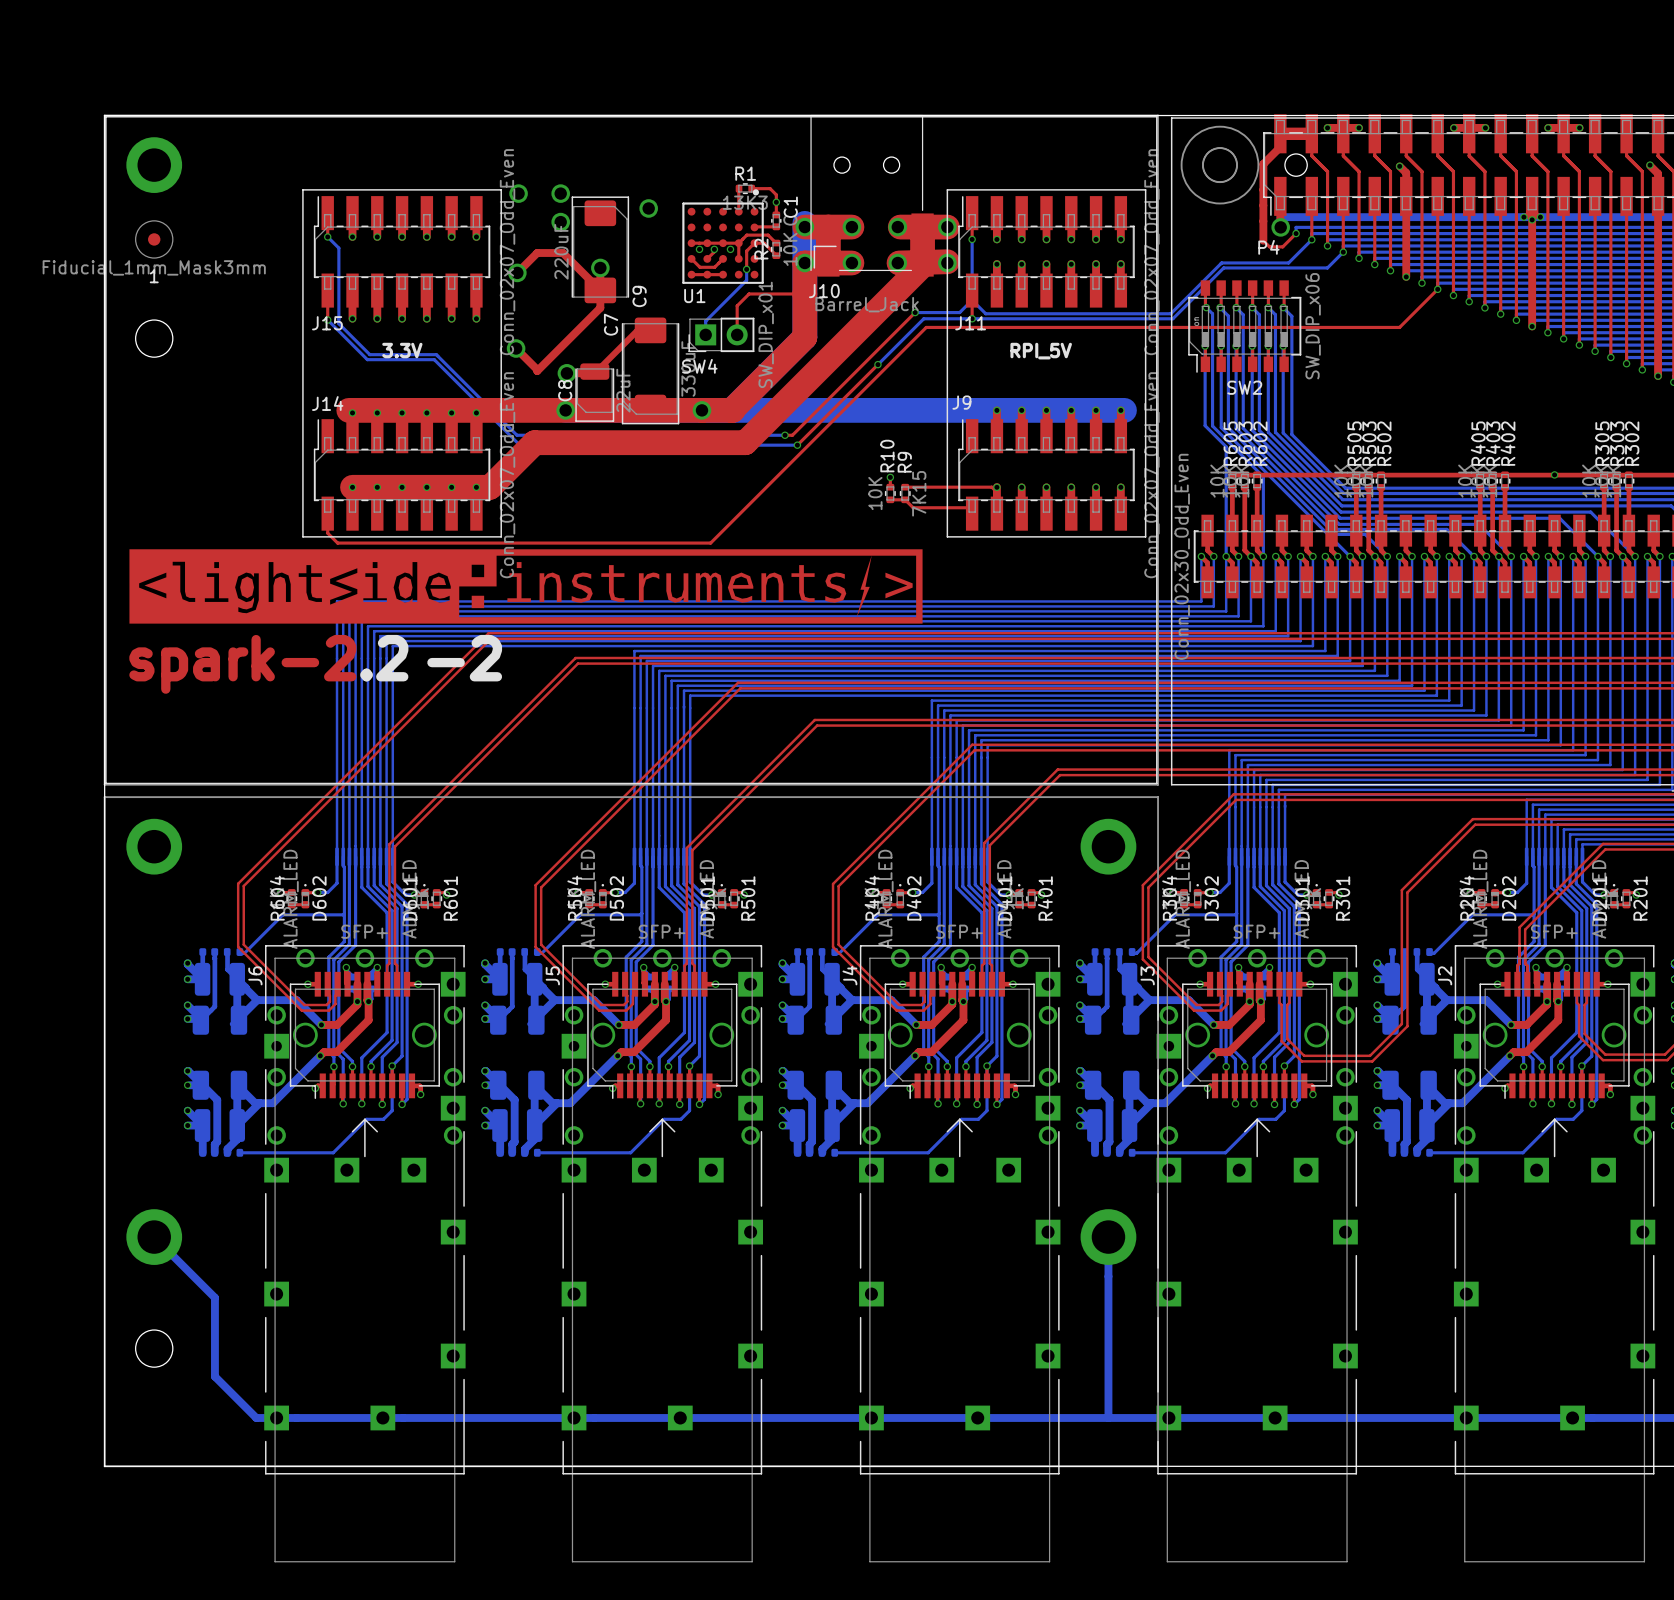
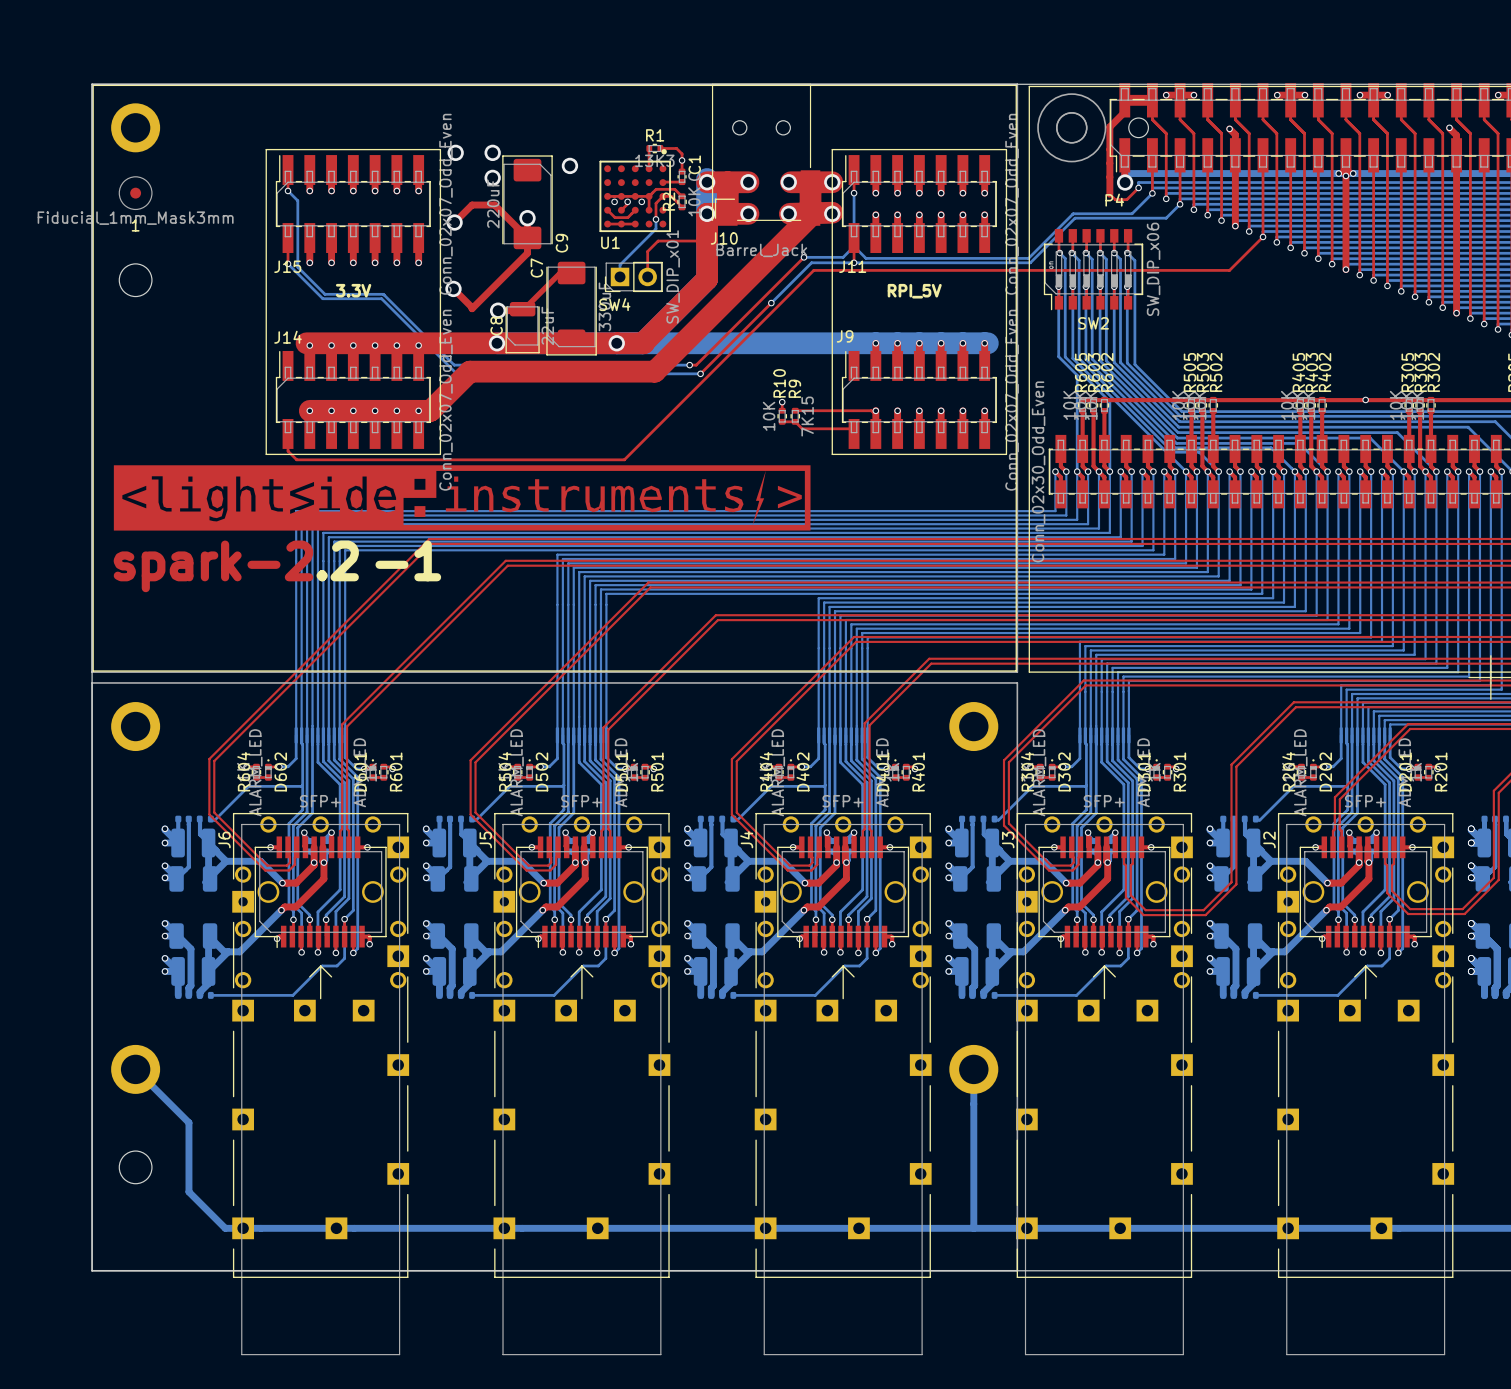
text: -2 (464, 658) -> -1 (408, 560)

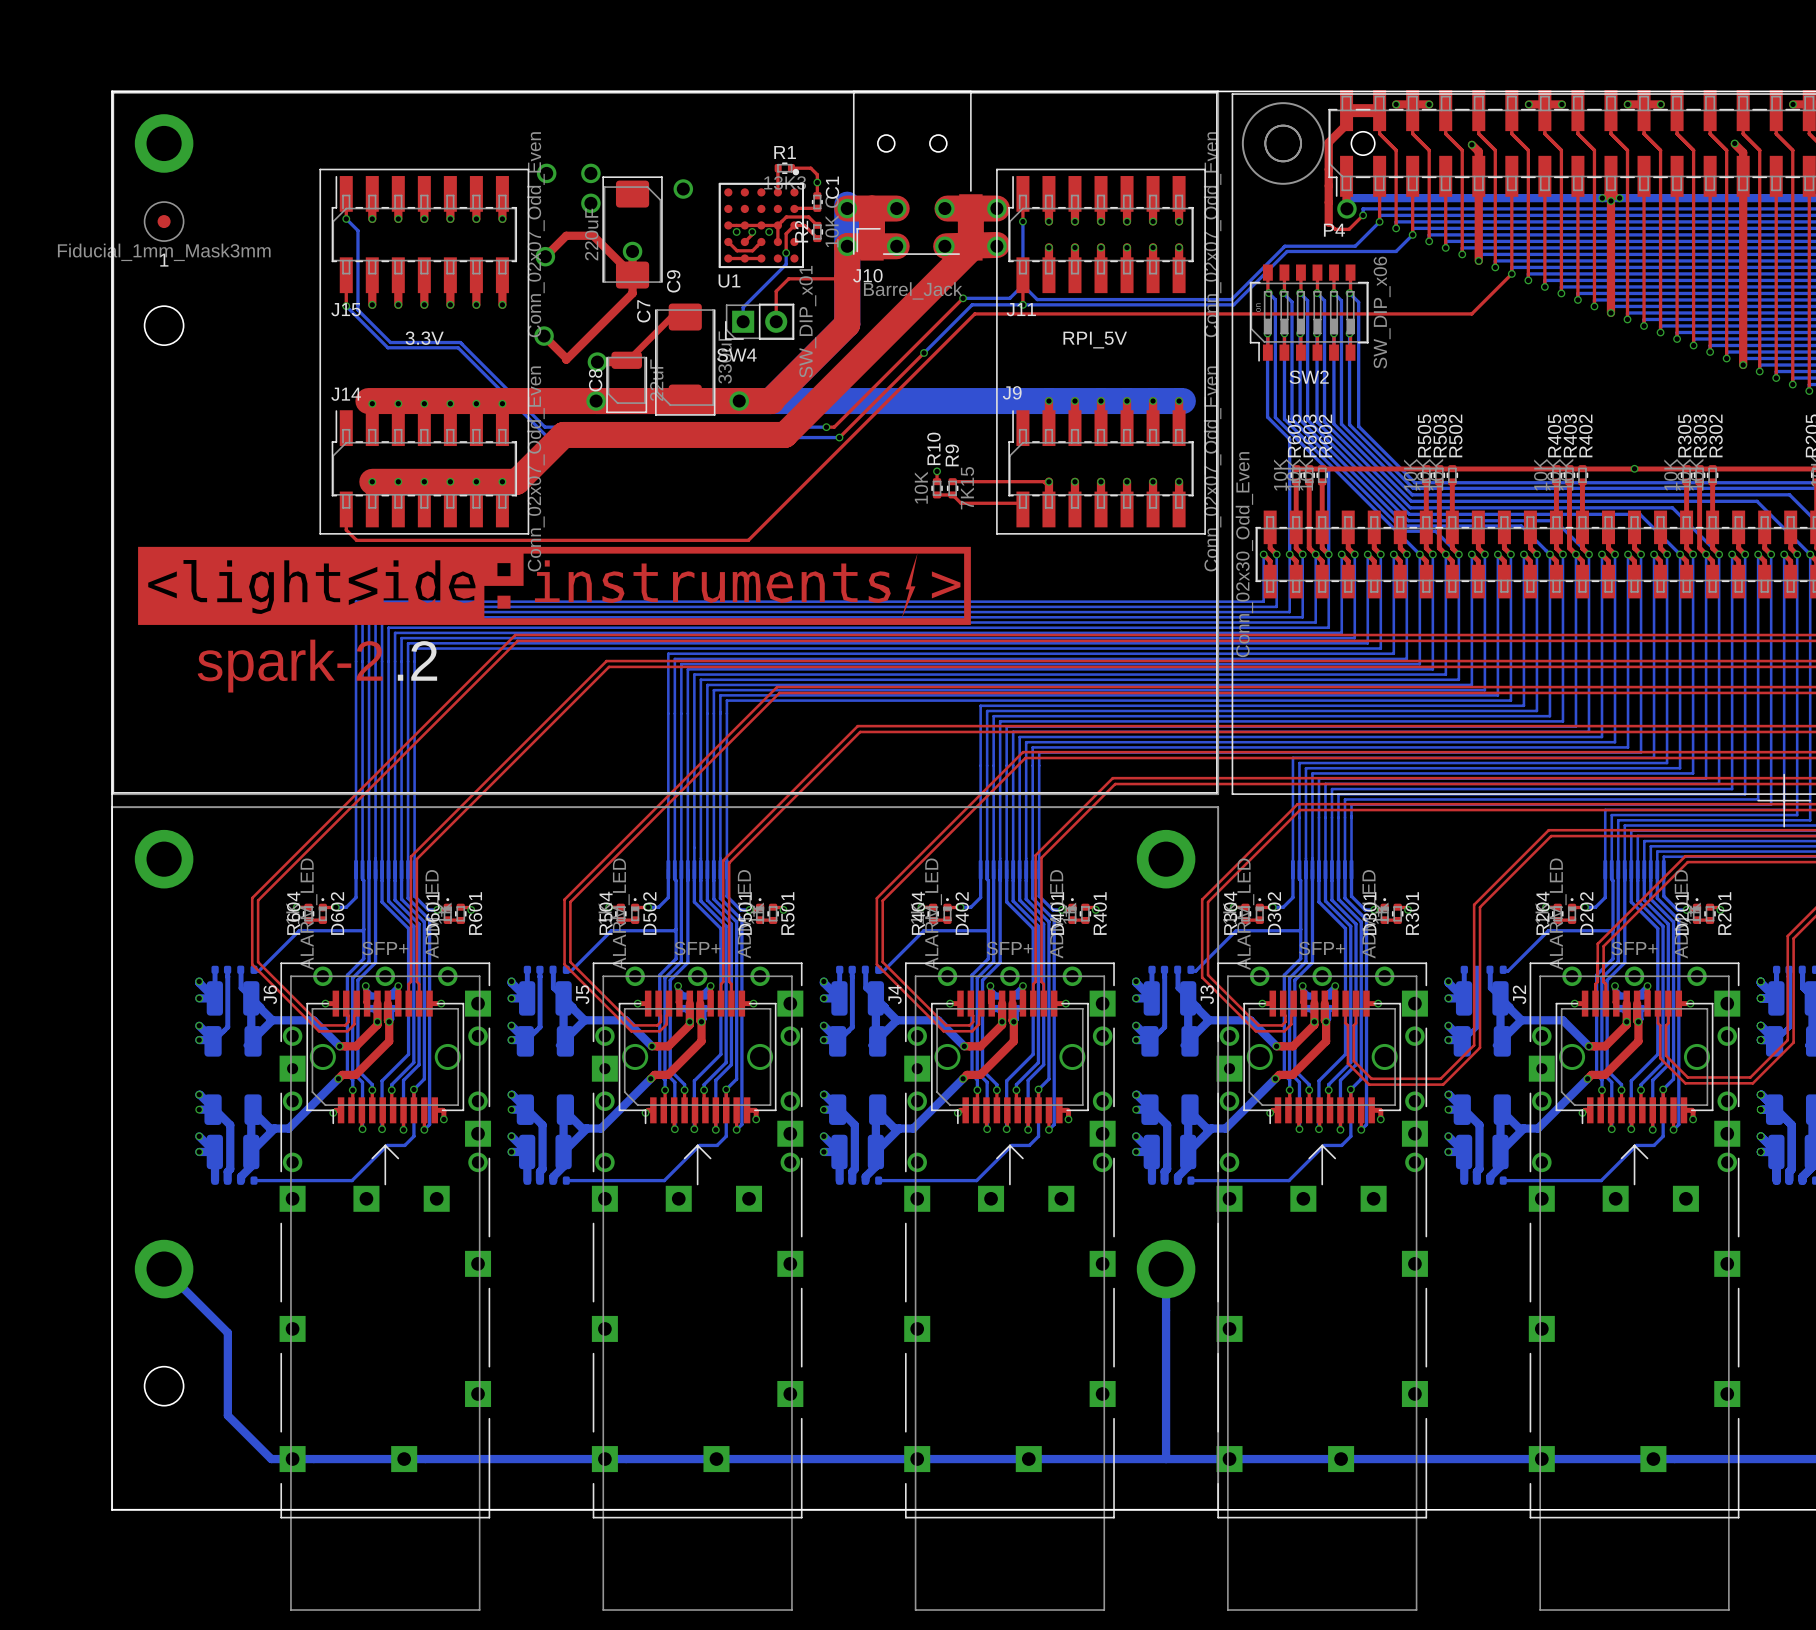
text: -1 (408, 560) -> none

